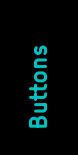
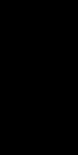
text: Buttons (38, 86) -> none

